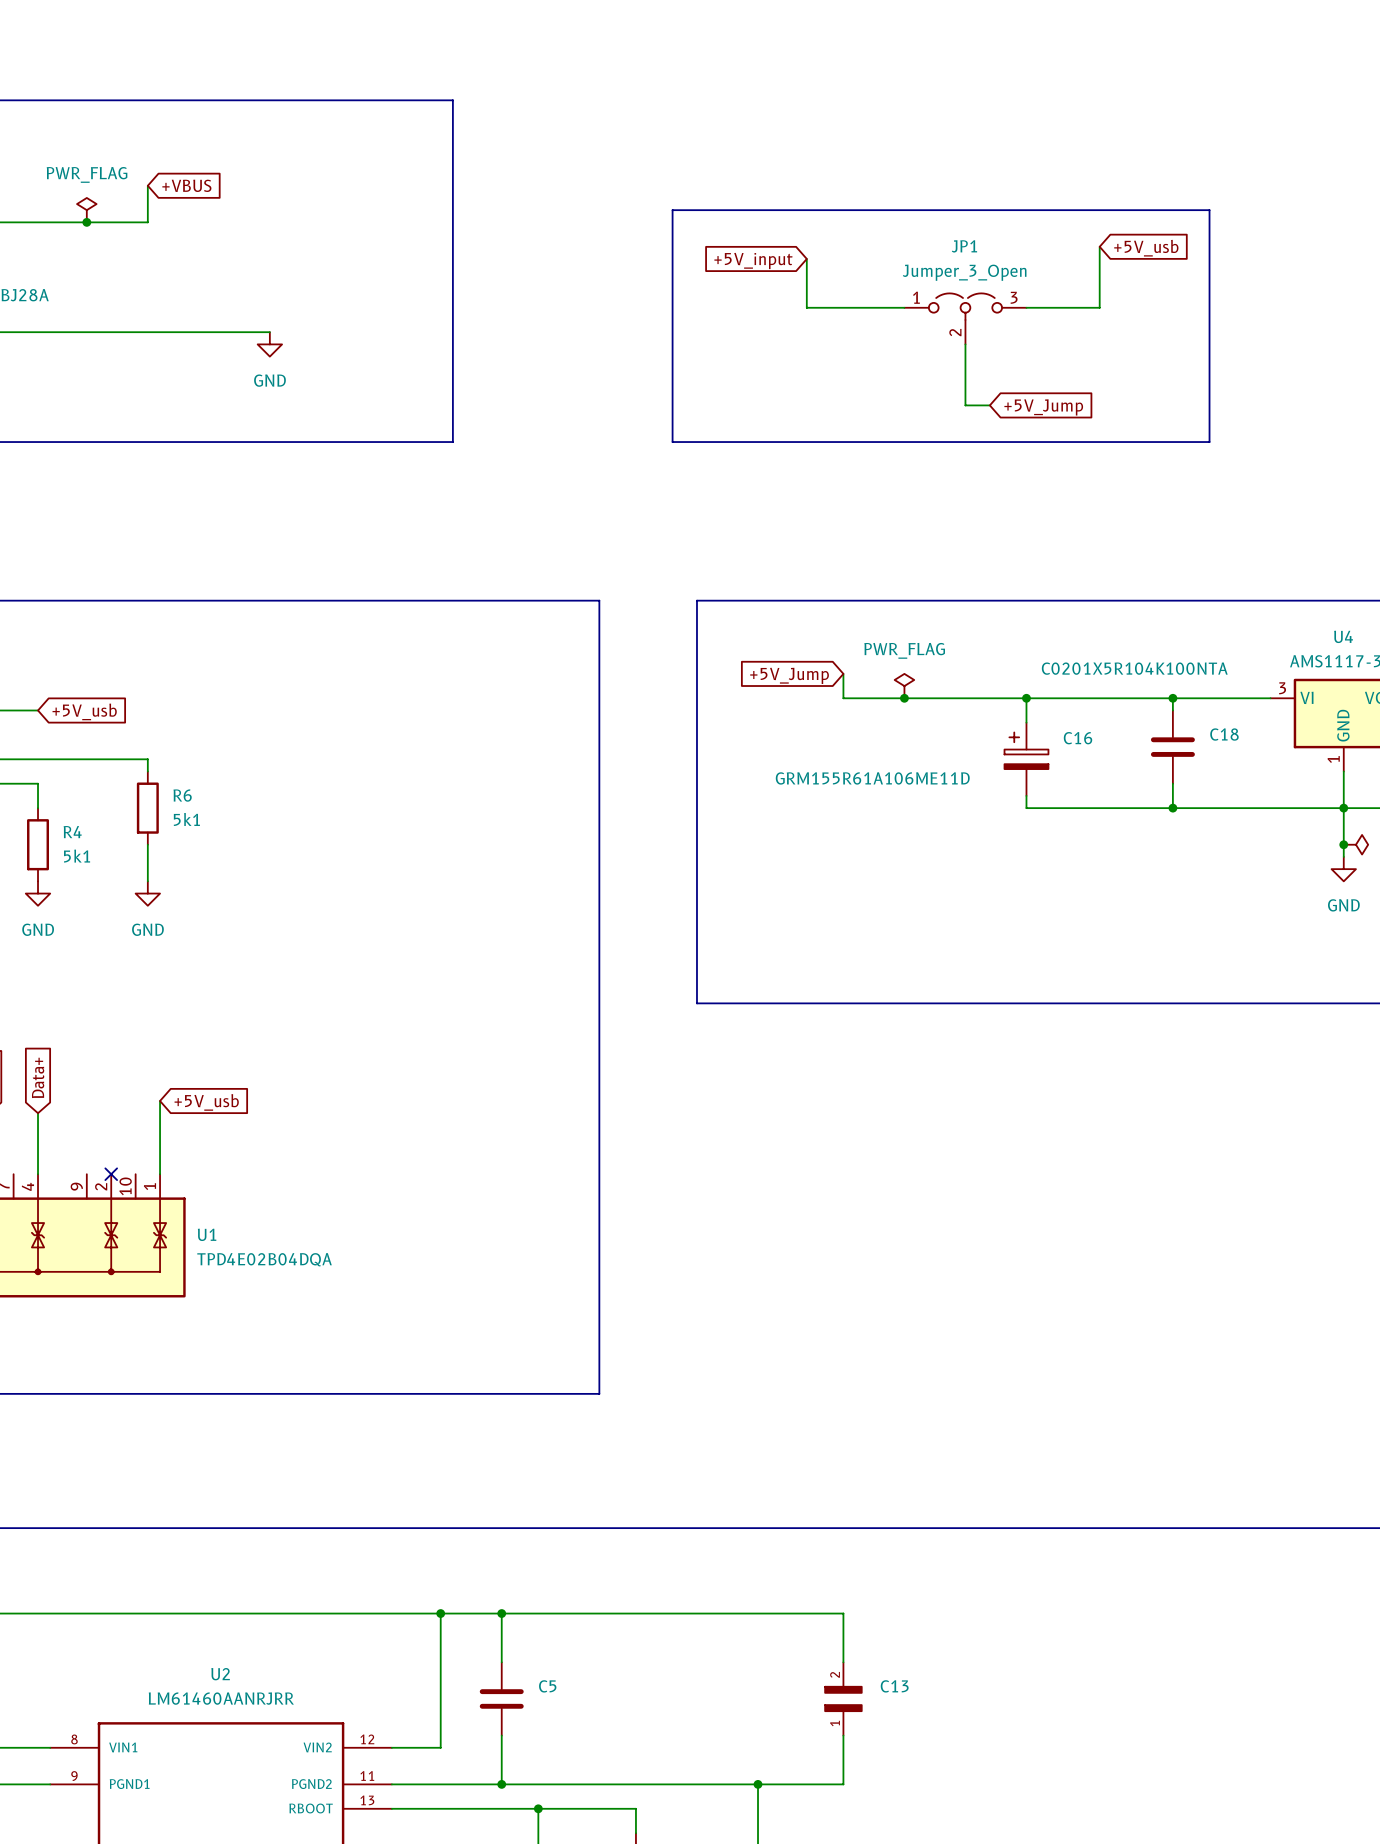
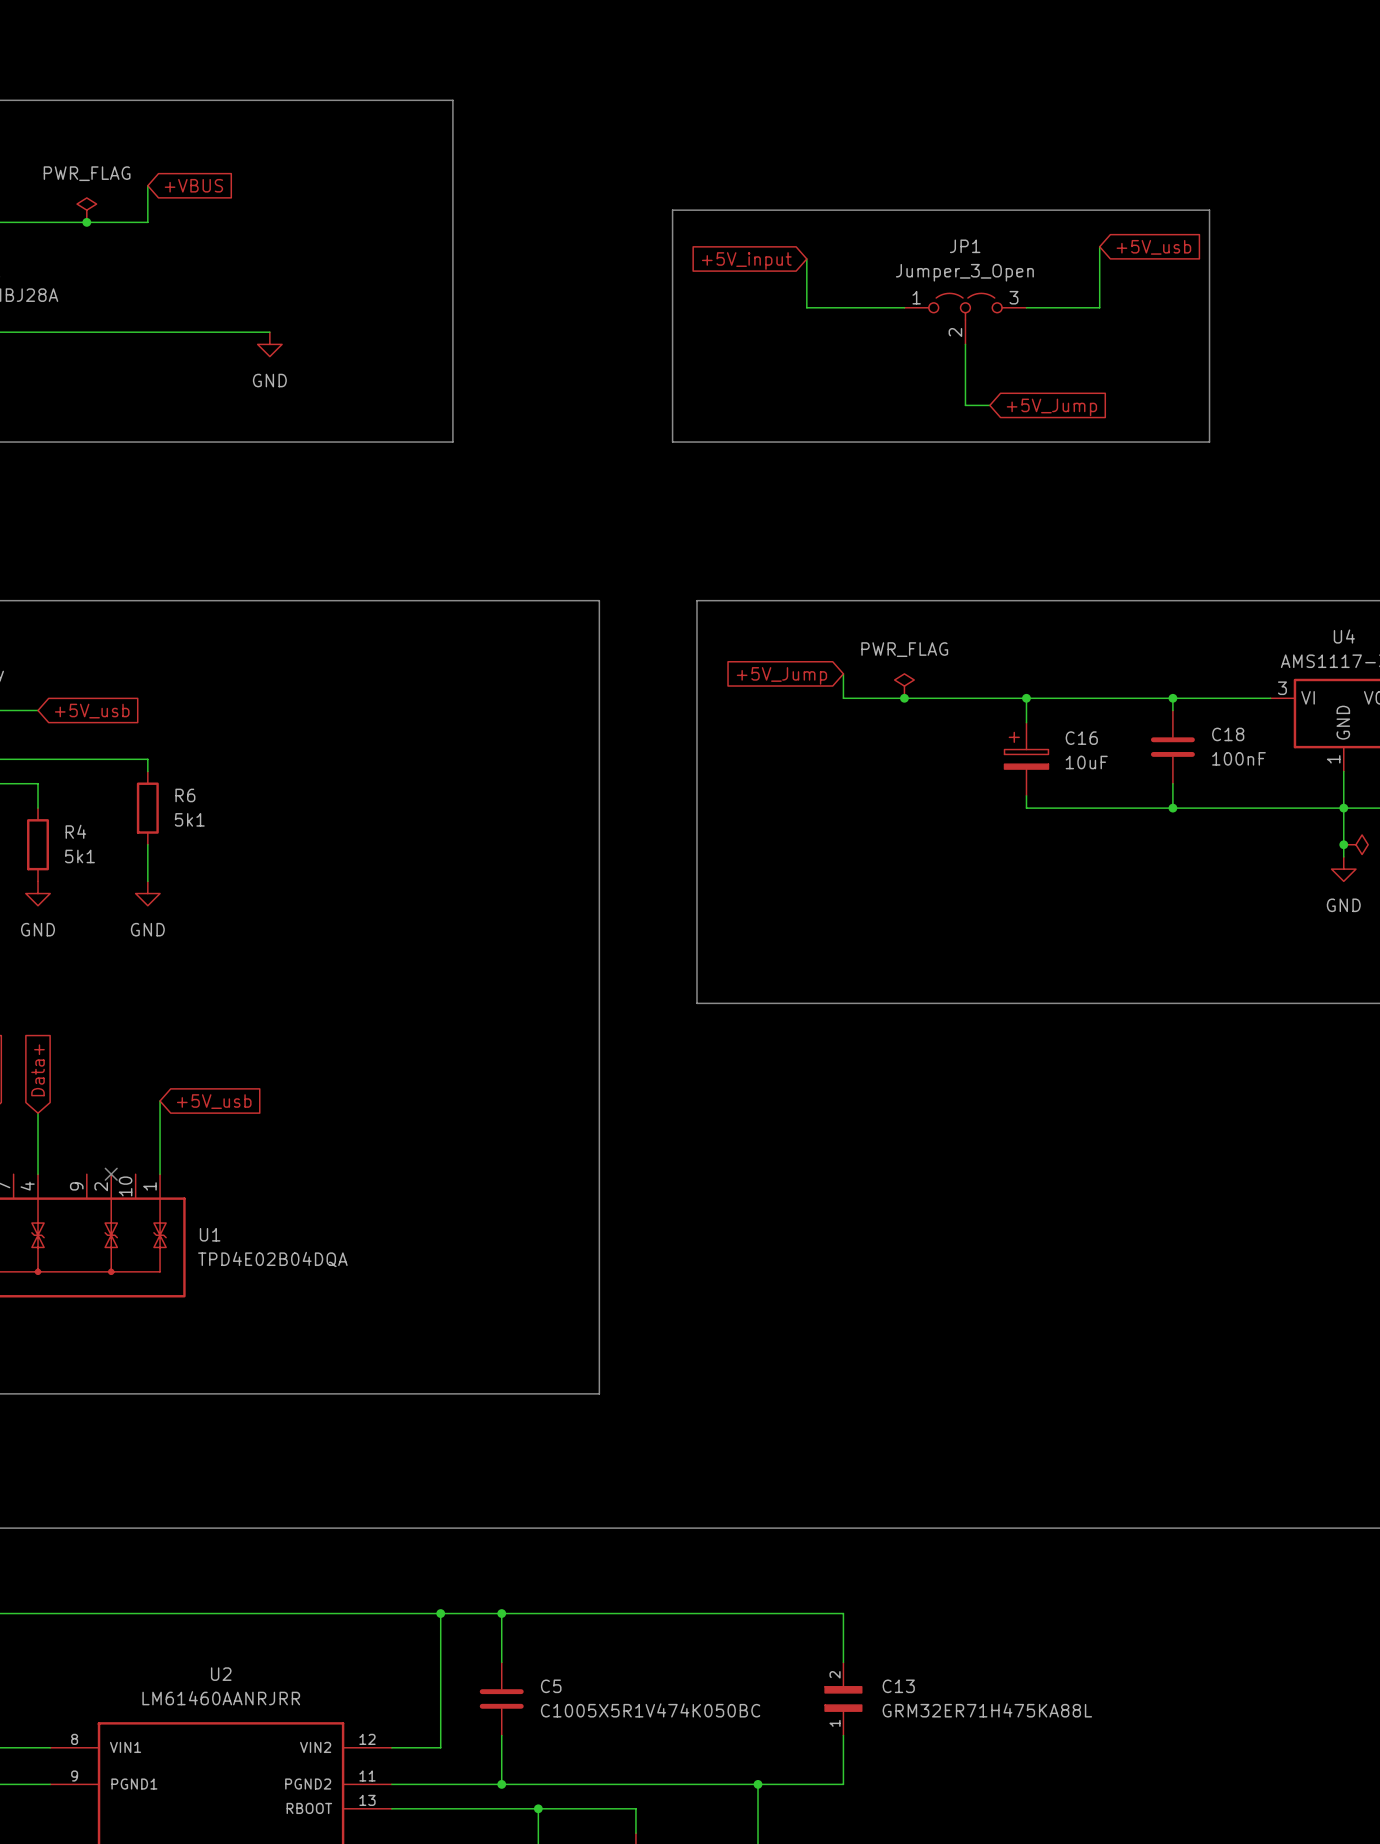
C18 value: C0201X5R104K100NTA (1134, 668) -> 100nF (1238, 758)
C16 value: GRM155R61A106ME11D (872, 778) -> 10uF (1086, 762)
C5 value: none -> C1005X5R1V474K050BC (650, 1710)
C13 value: none -> GRM32ER71H475KA88L (987, 1710)

